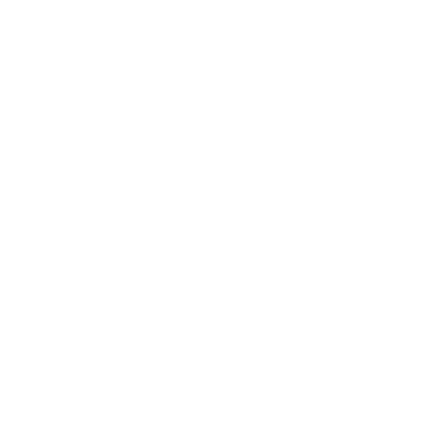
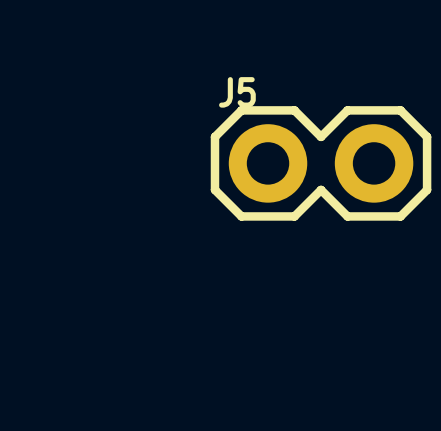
J5: none -> (321, 163)

